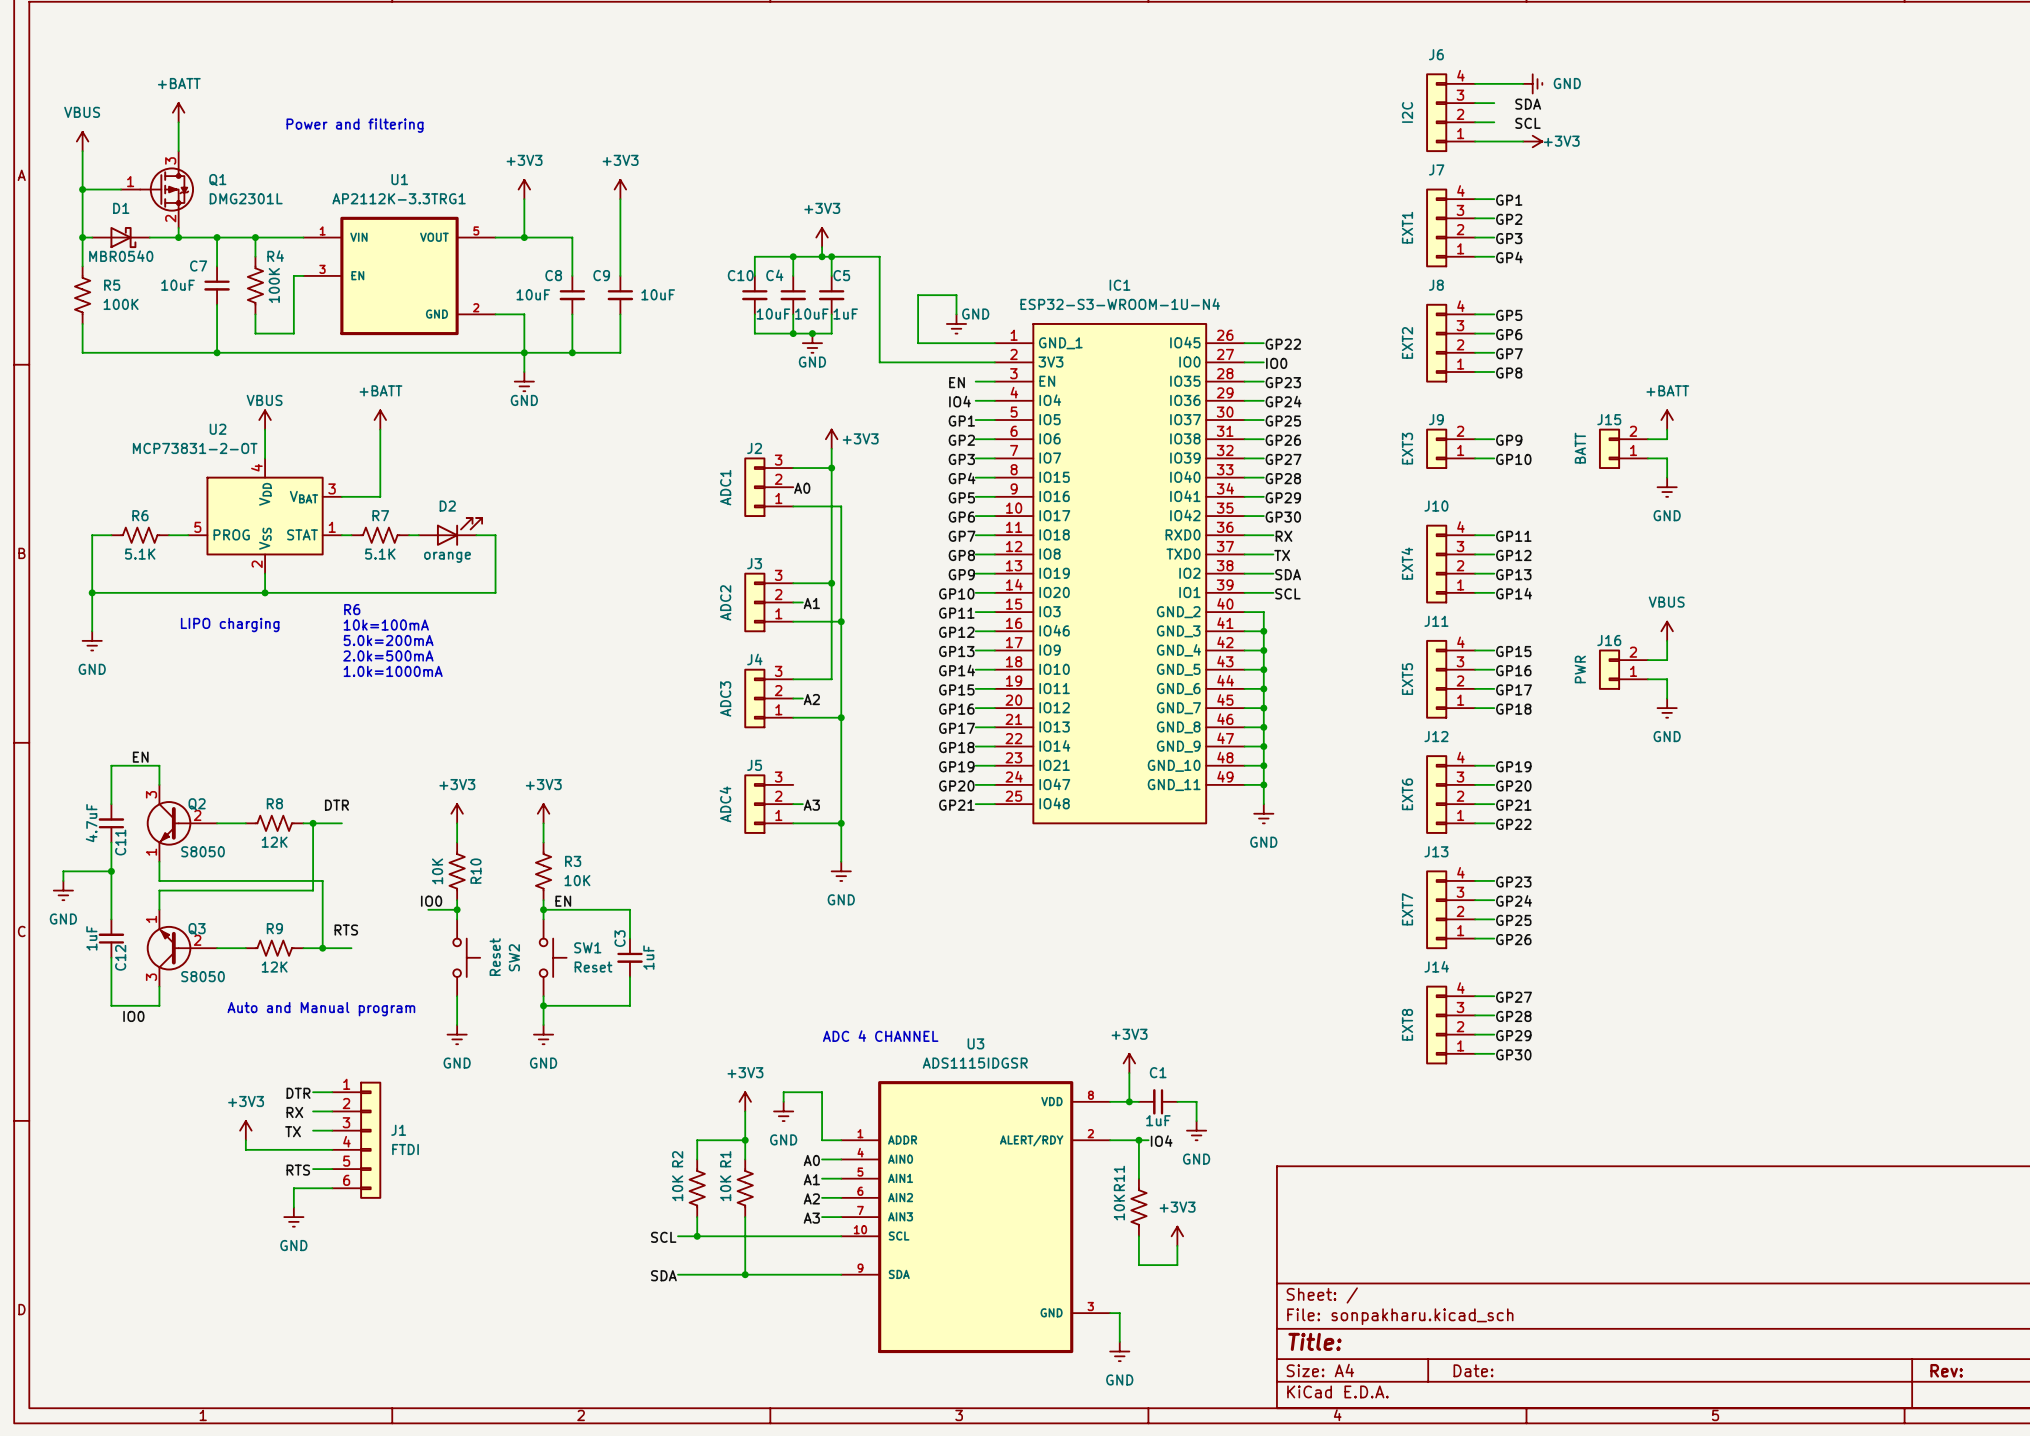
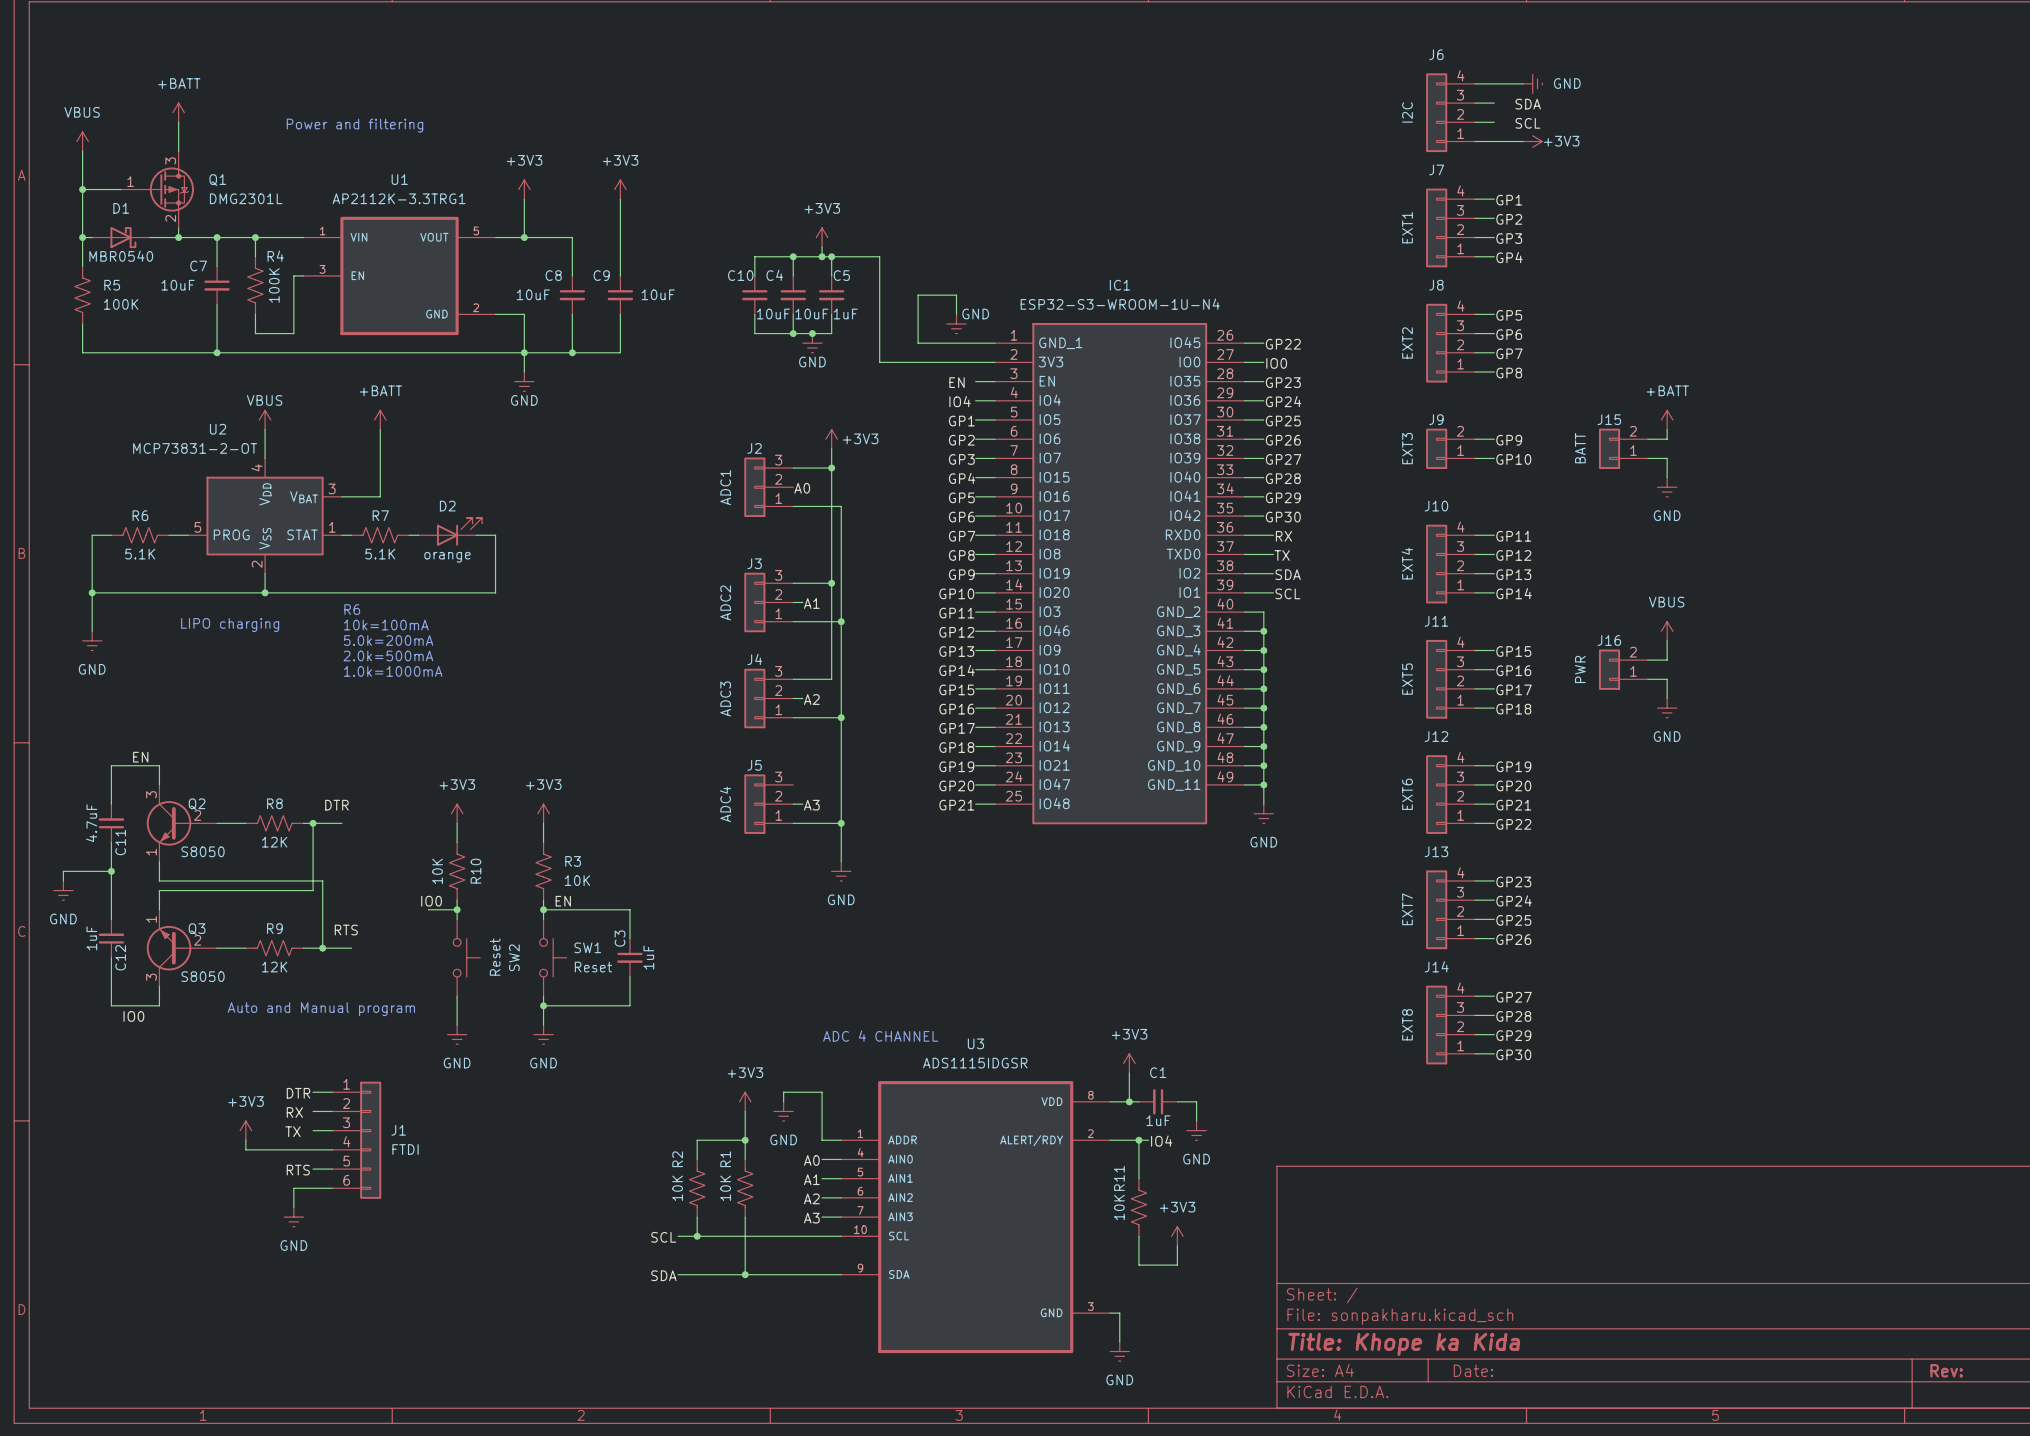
title block: Title: (1315, 1341) -> Title: Khope ka Kida (1404, 1344)

